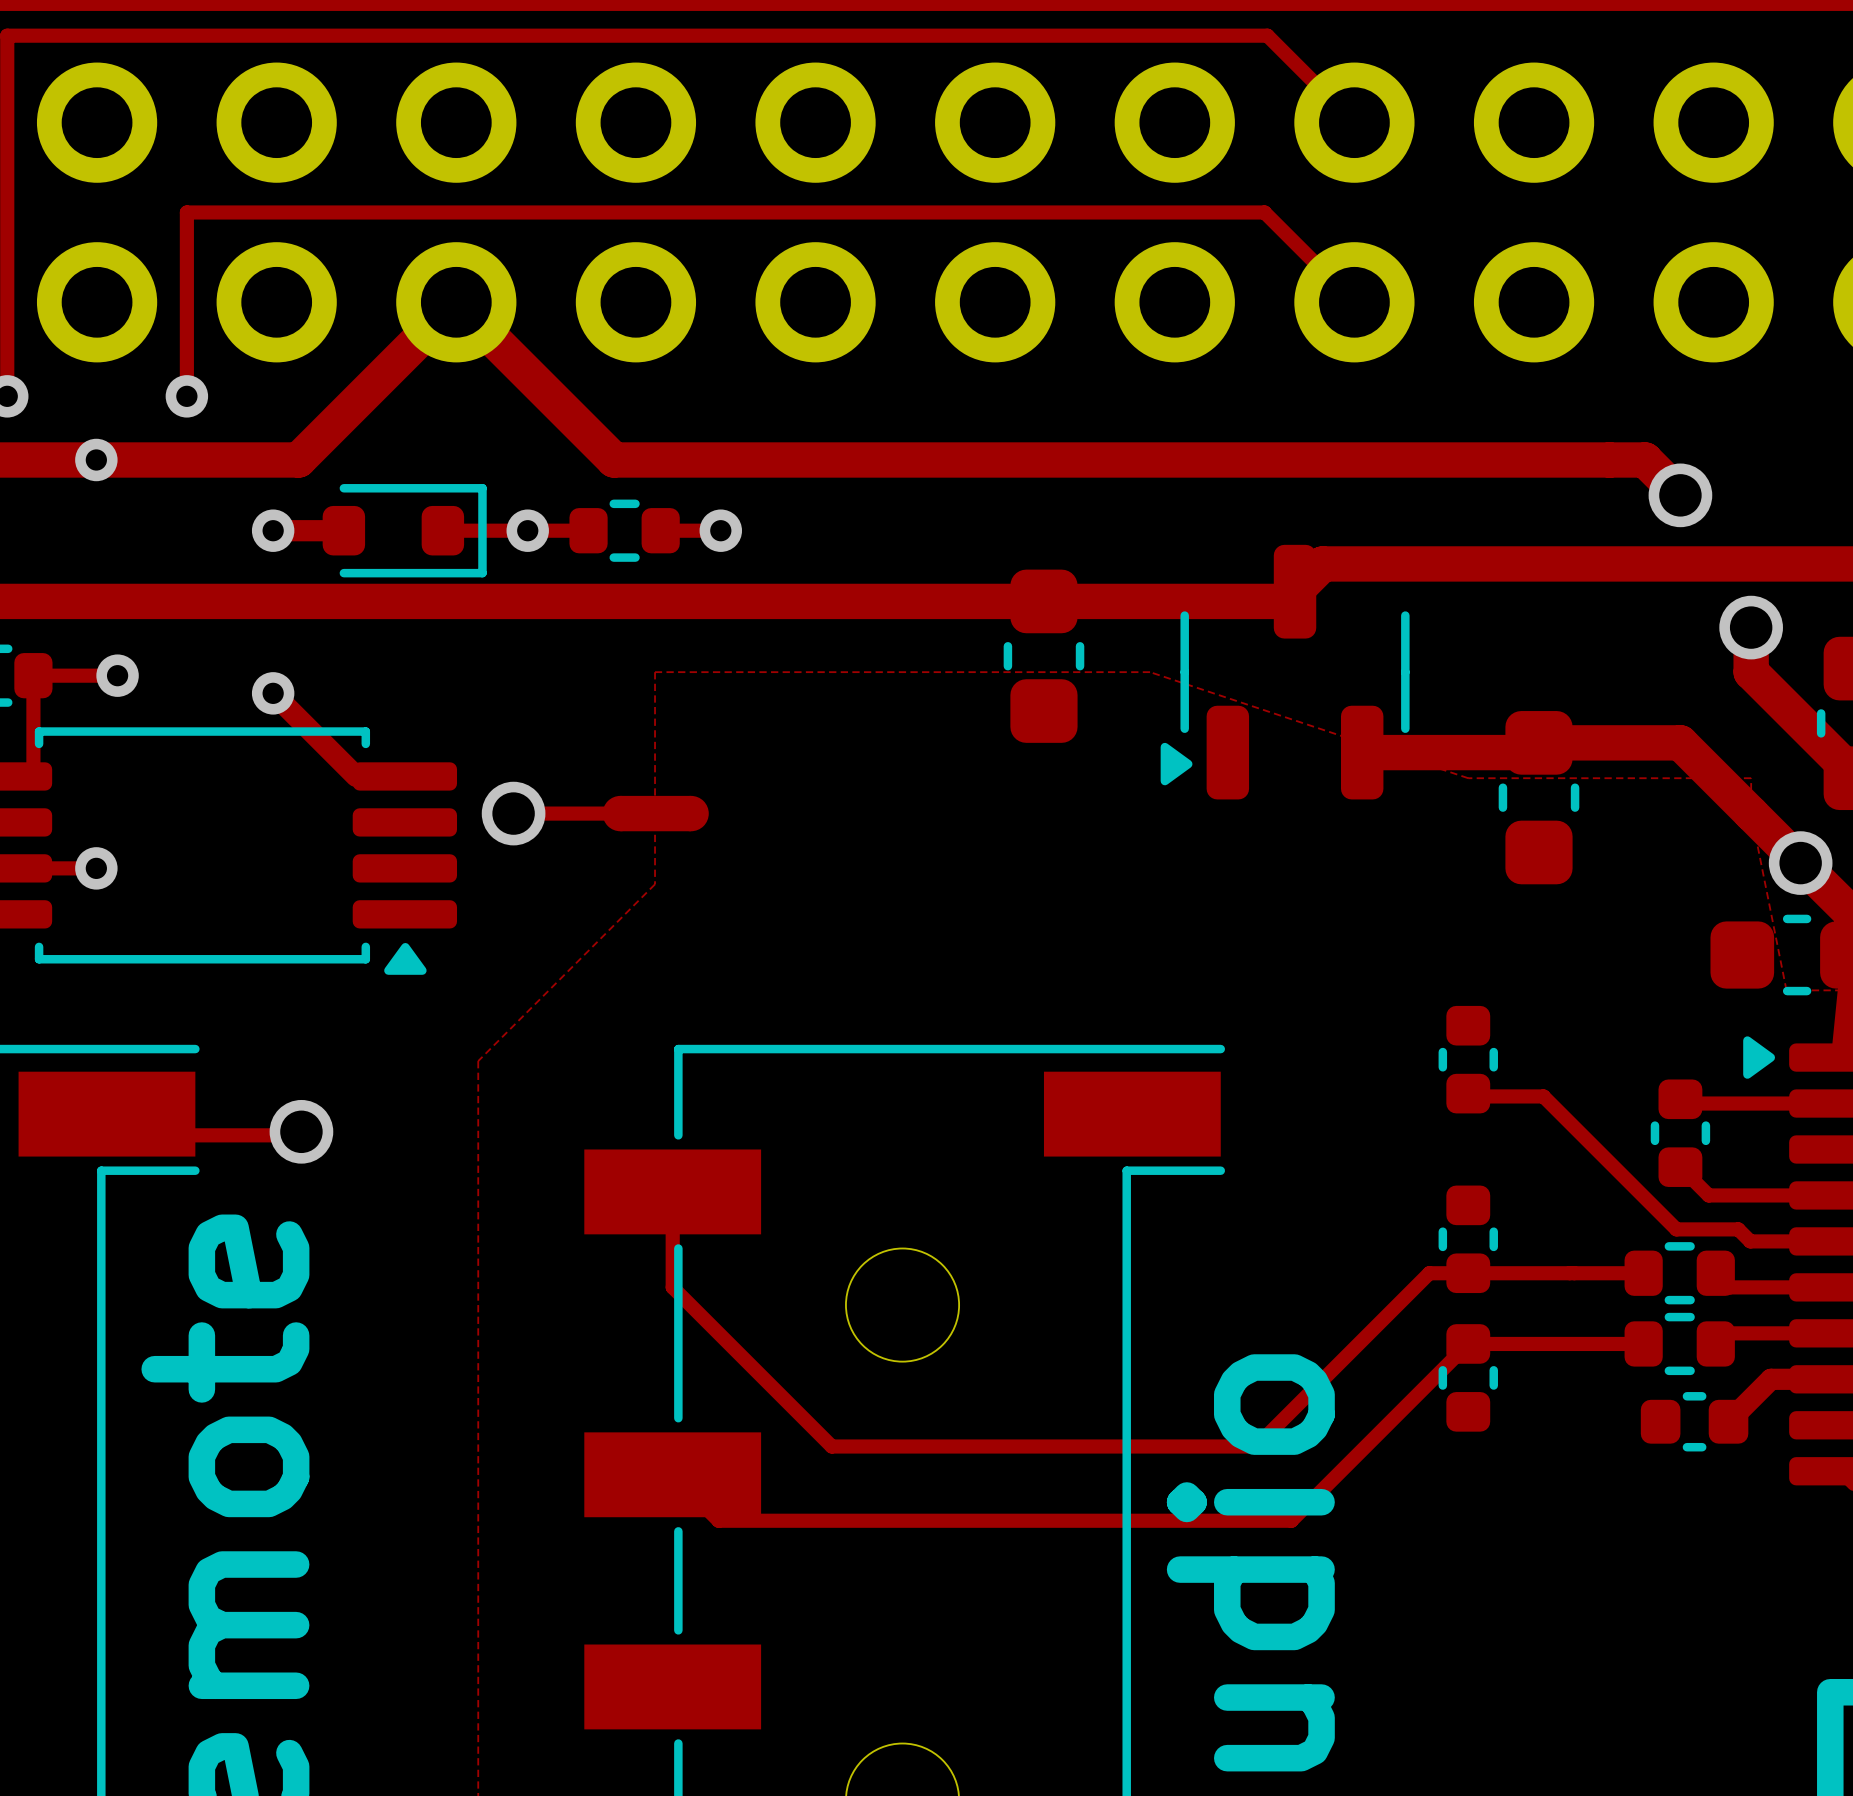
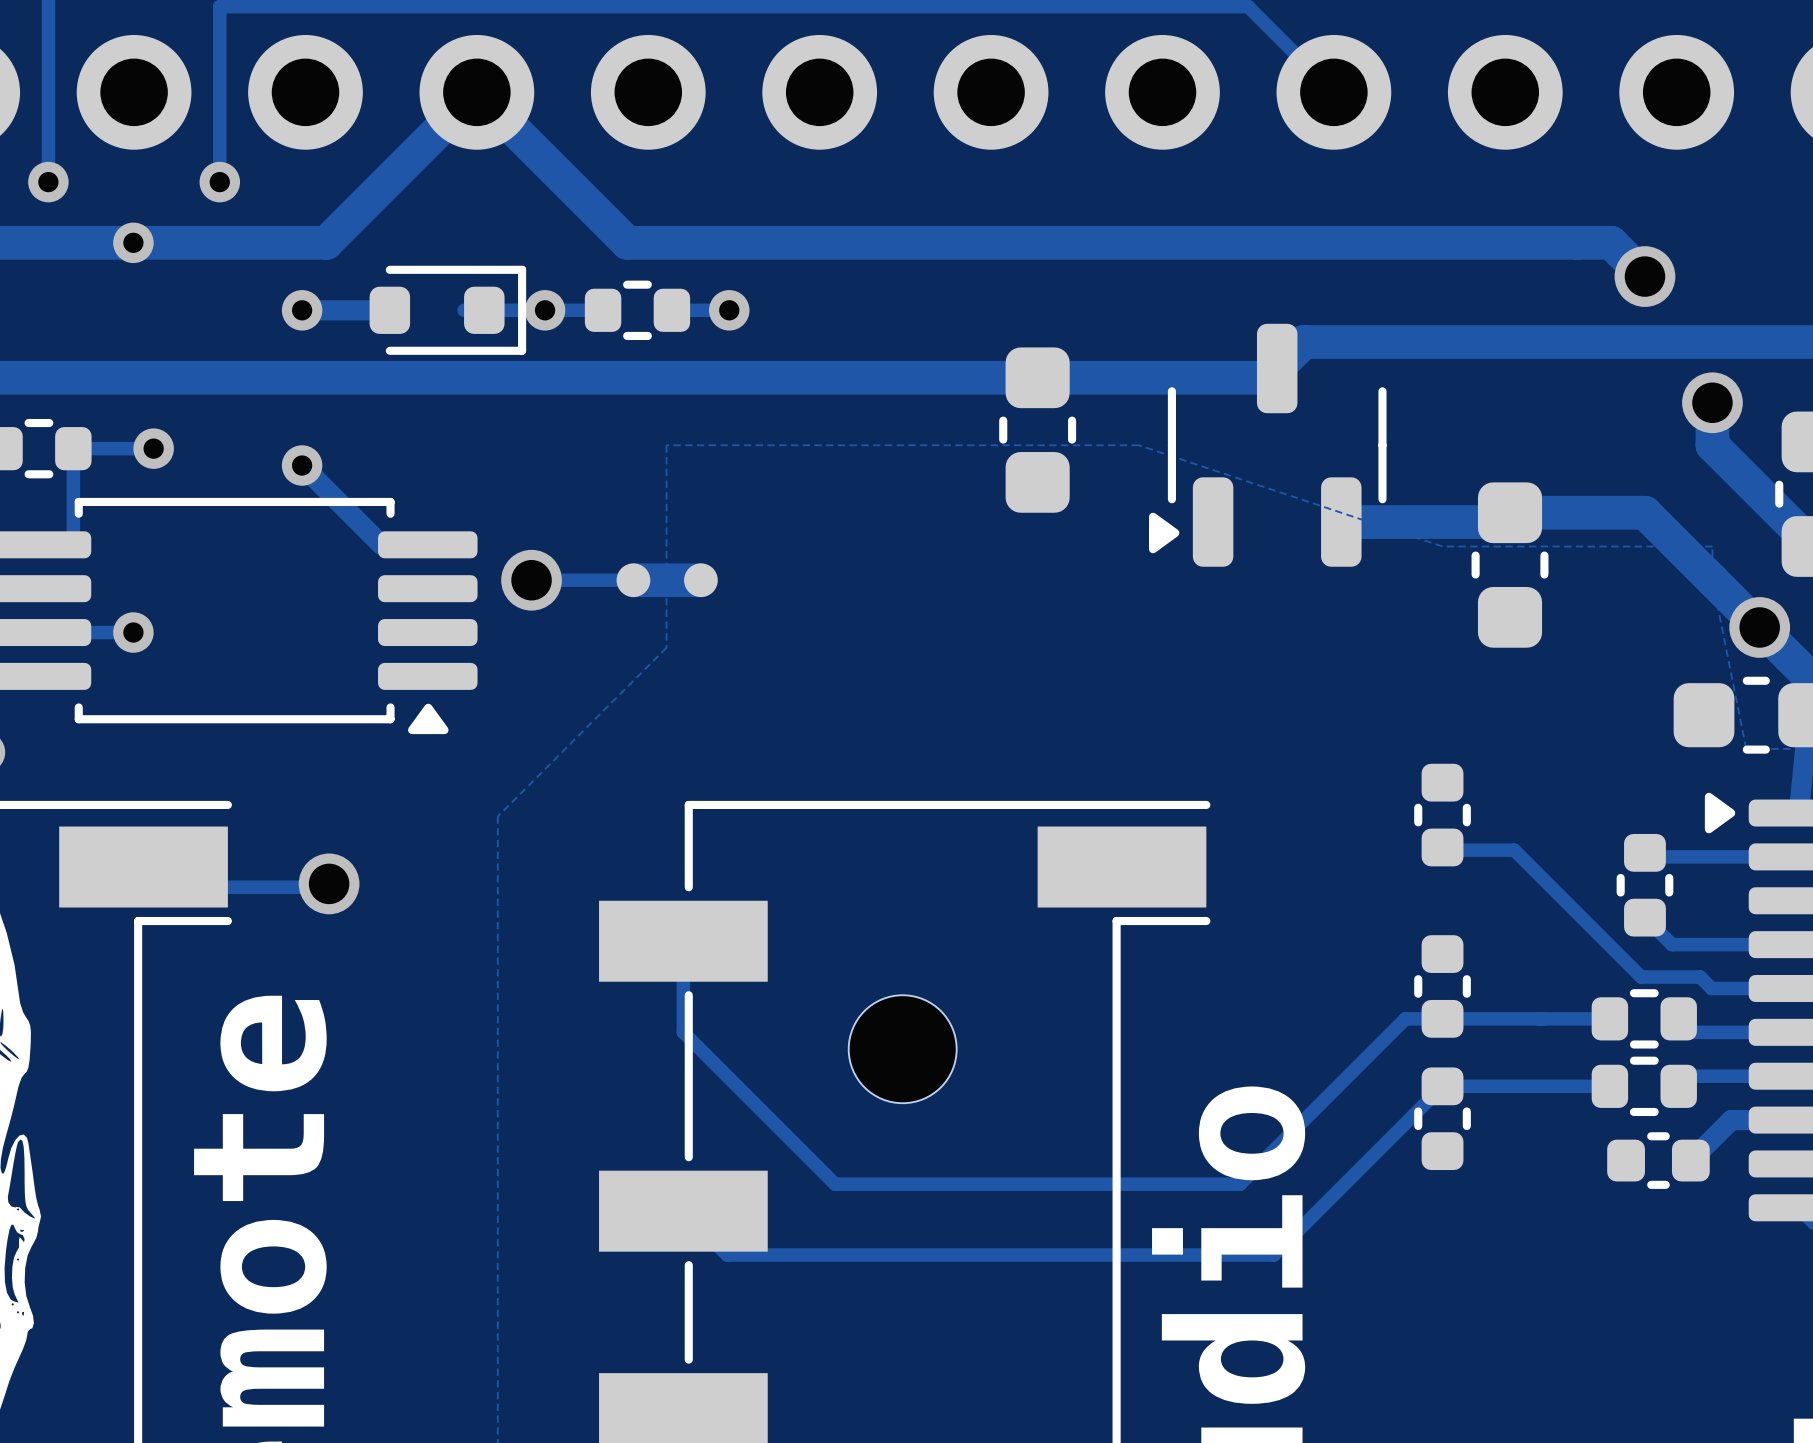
part position: (404, 530) -> (447, 310)

